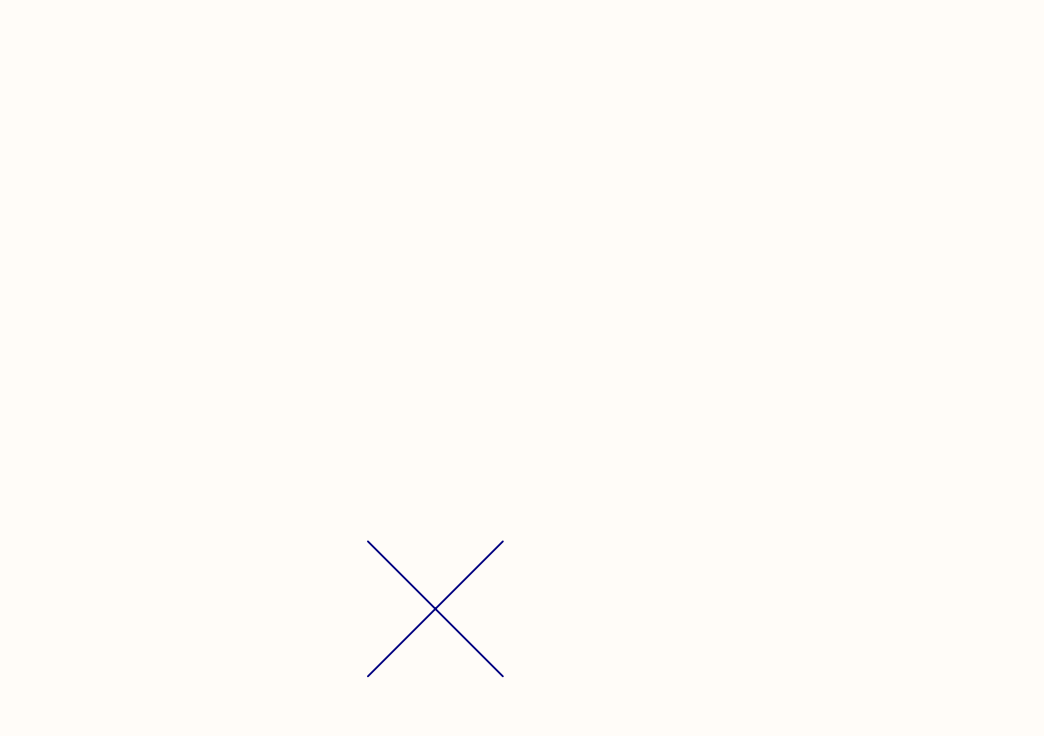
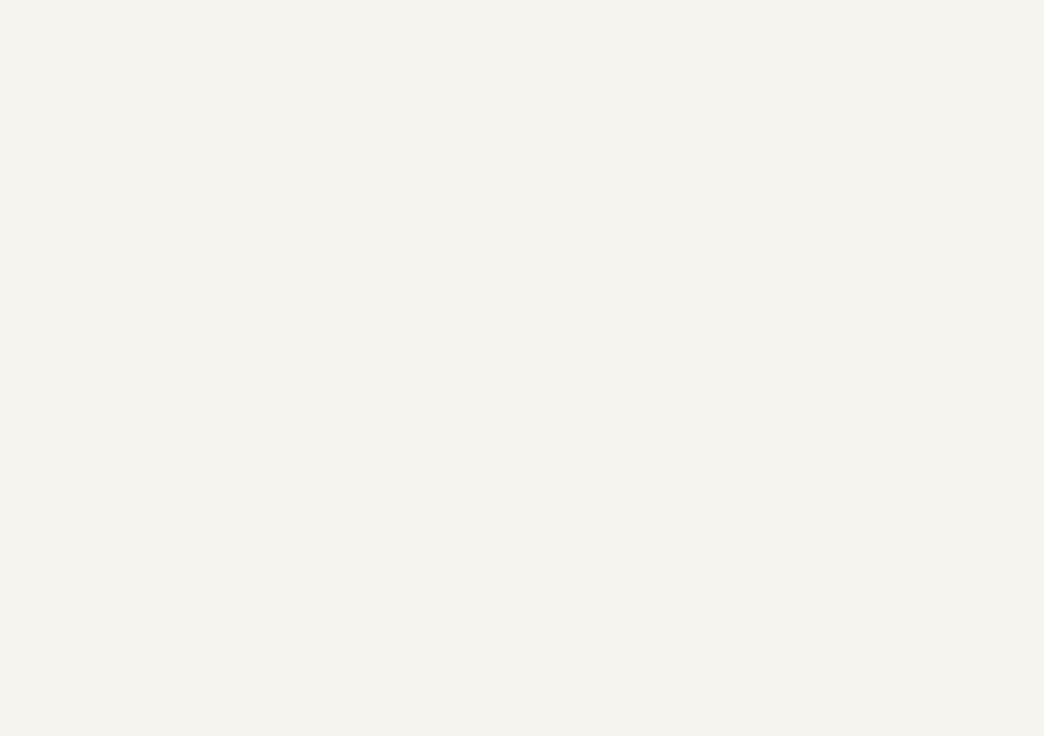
no-connect mark: (435, 608) -> none

